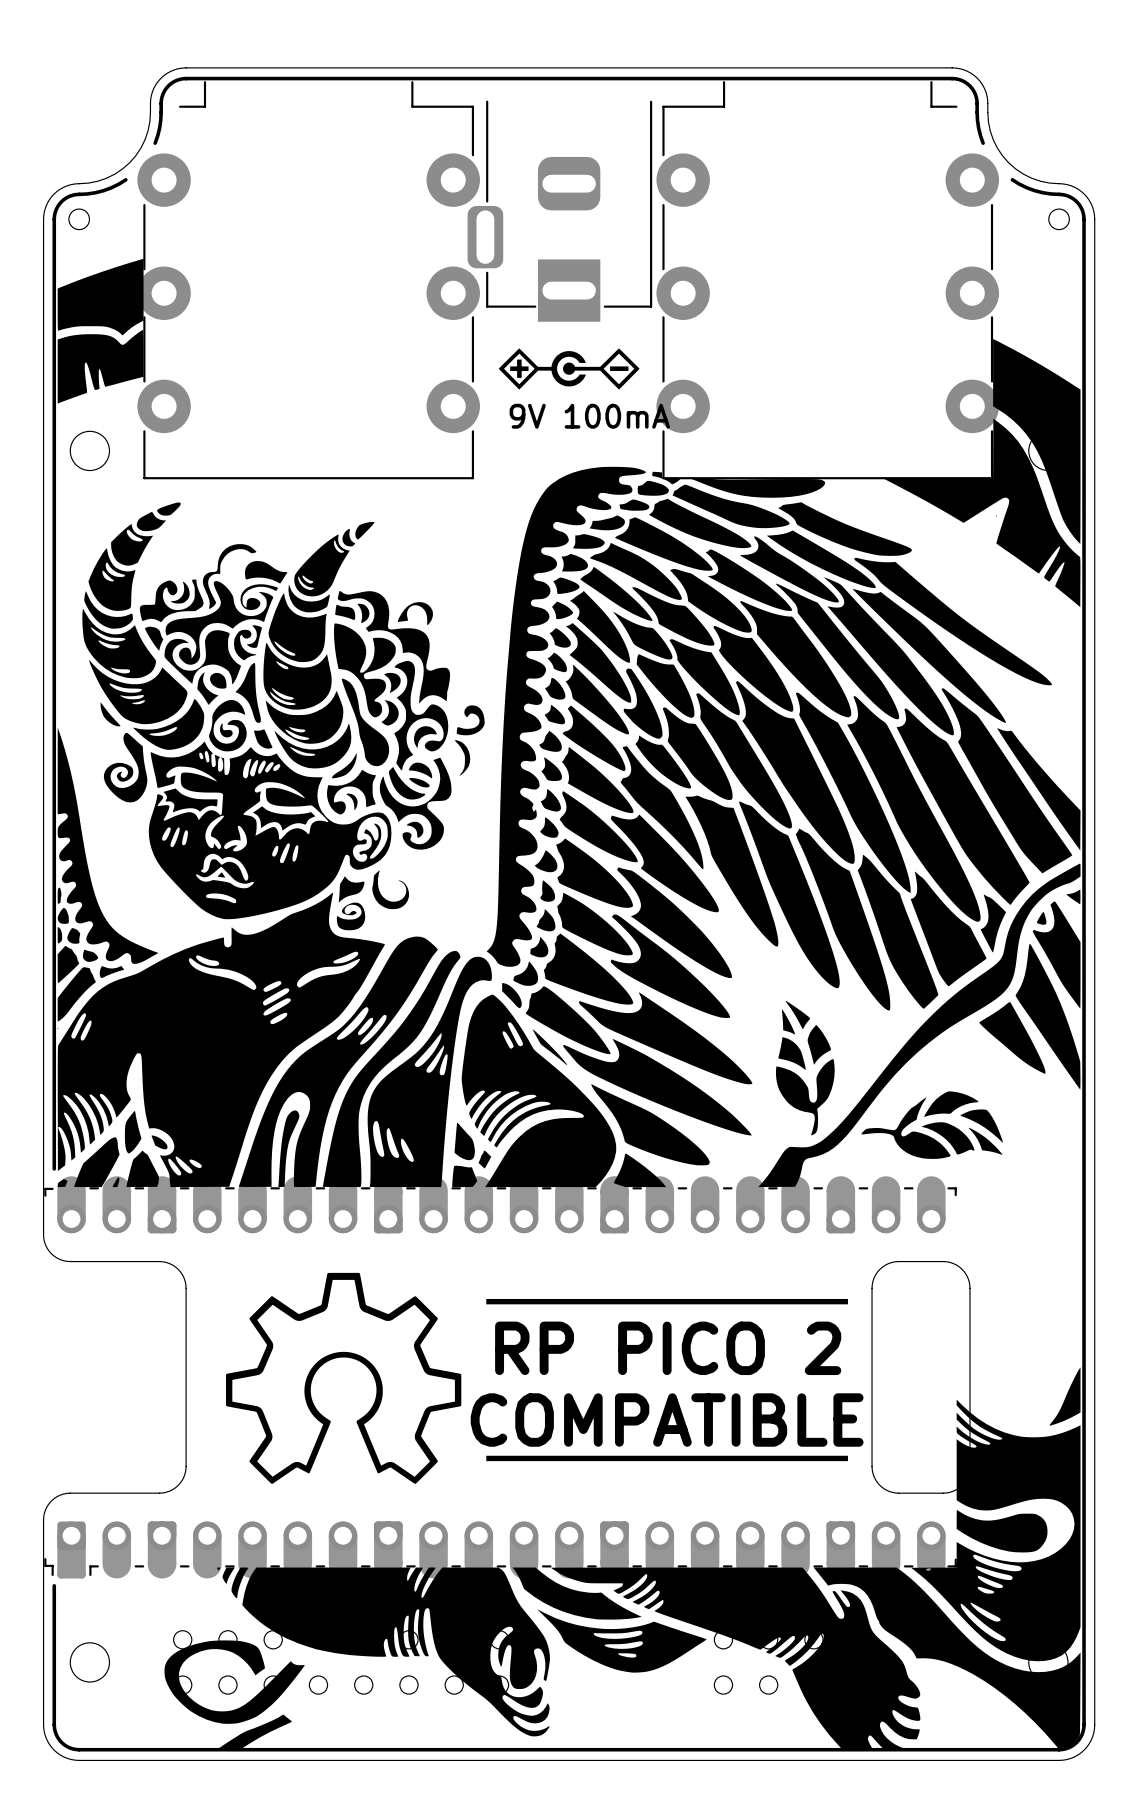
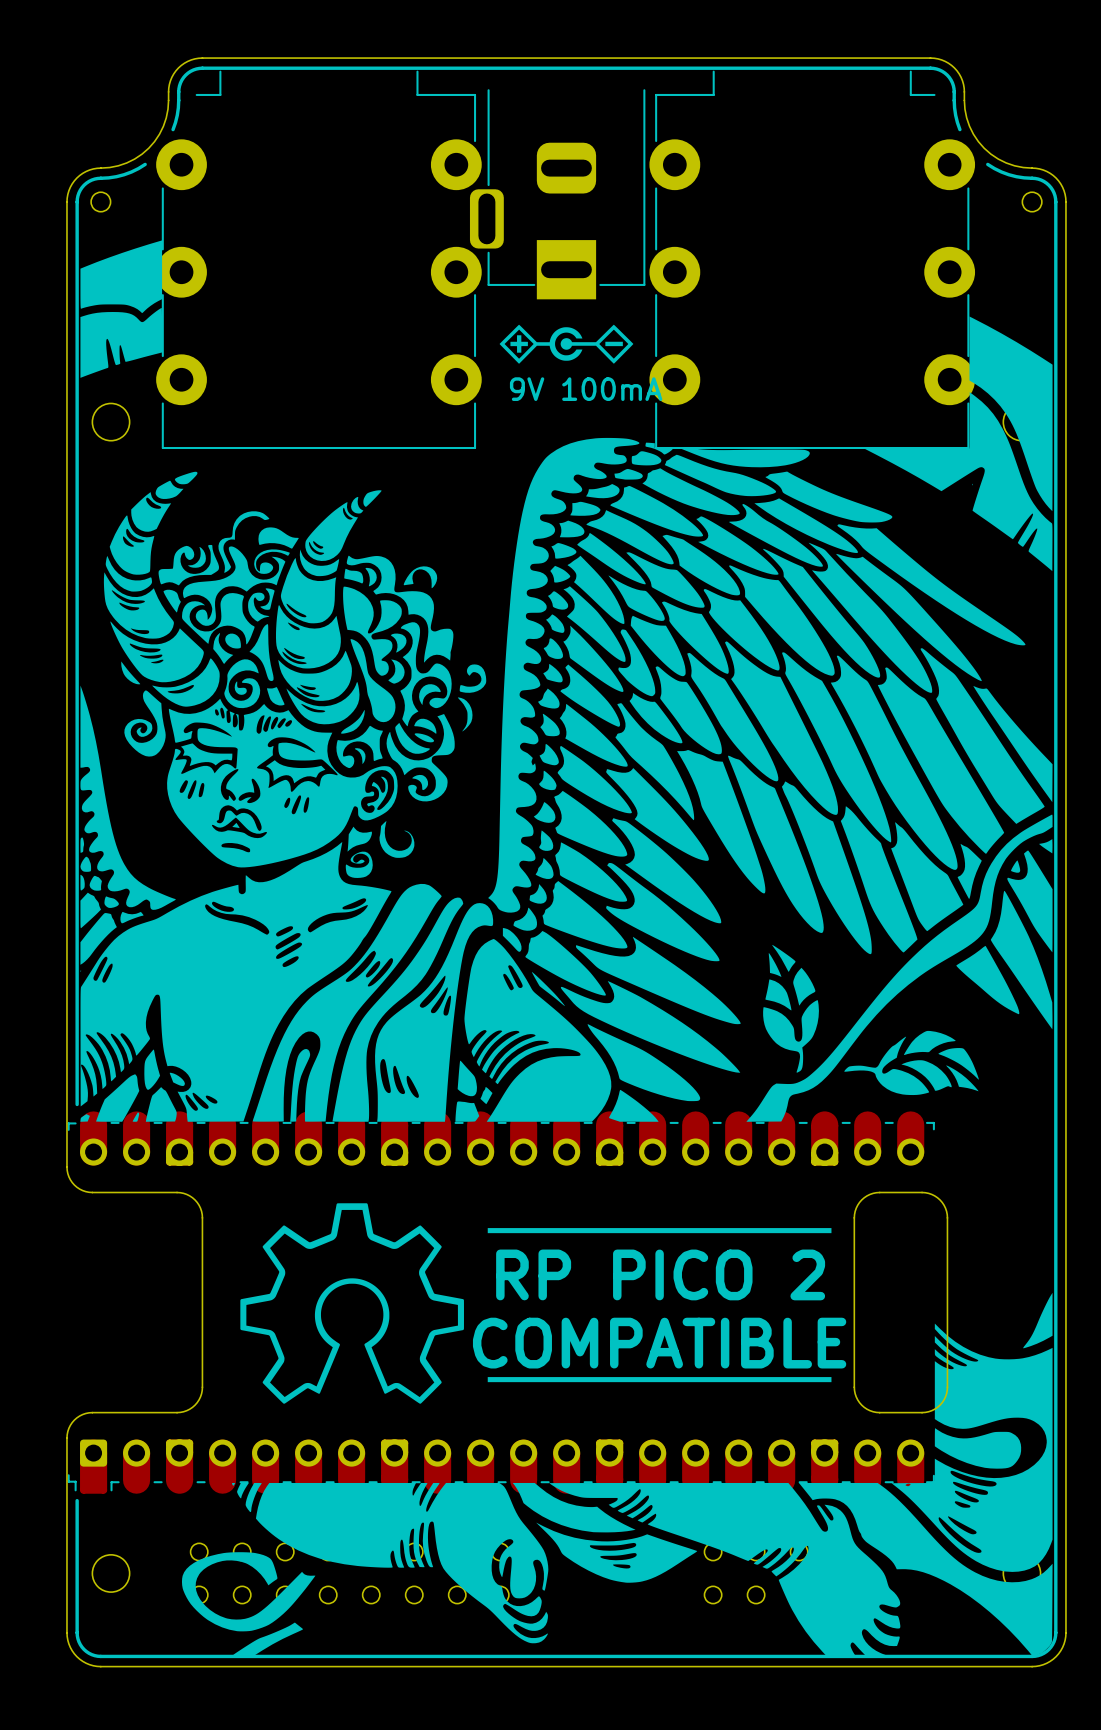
drawing shape: [57, 258, 1081, 1749] -> [80, 240, 1053, 1656]

